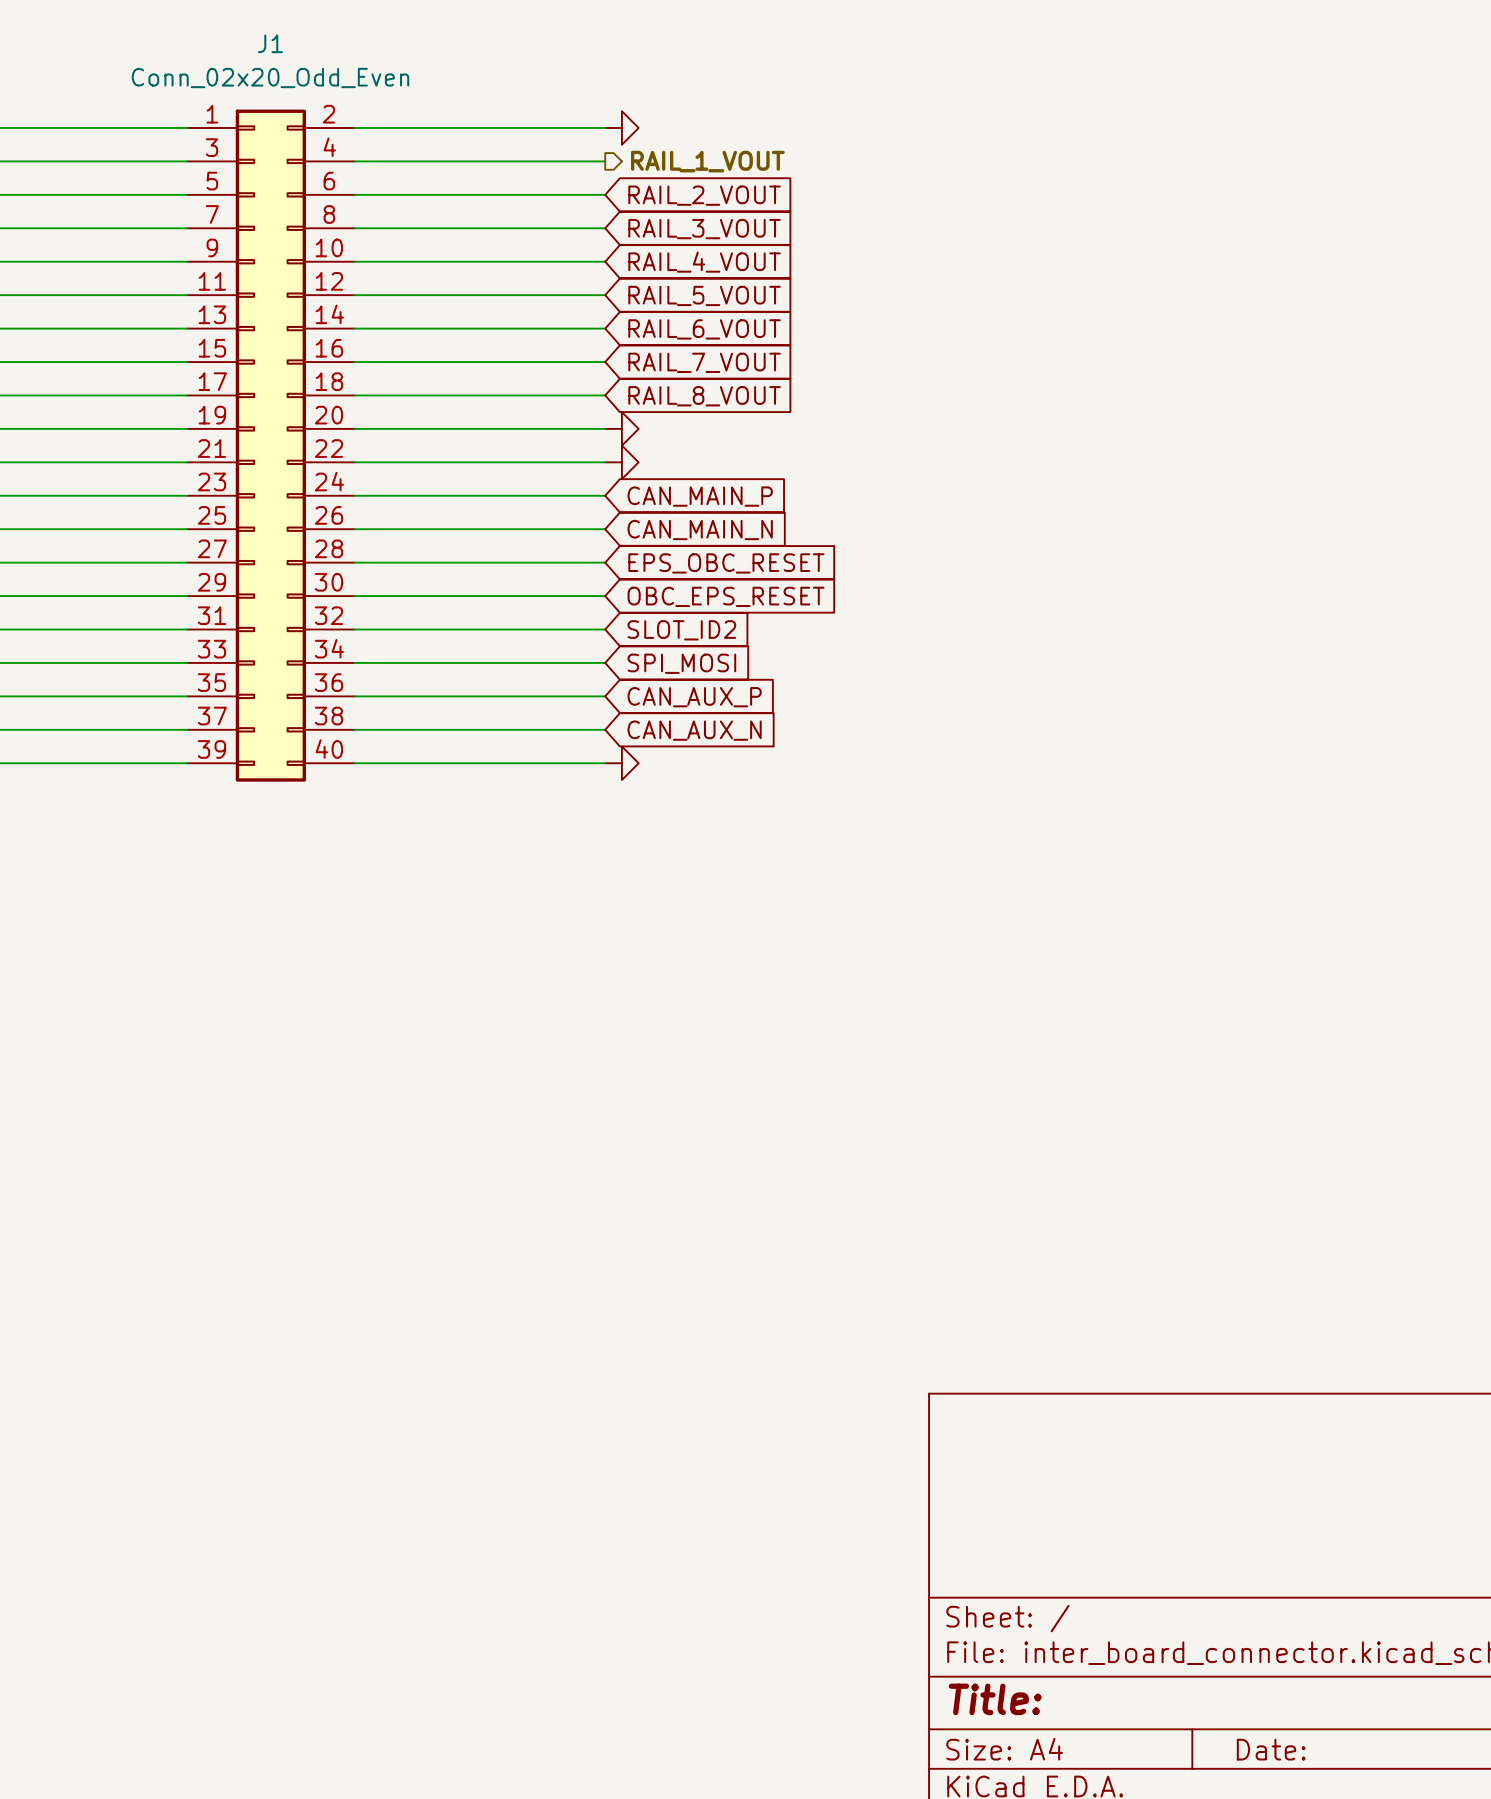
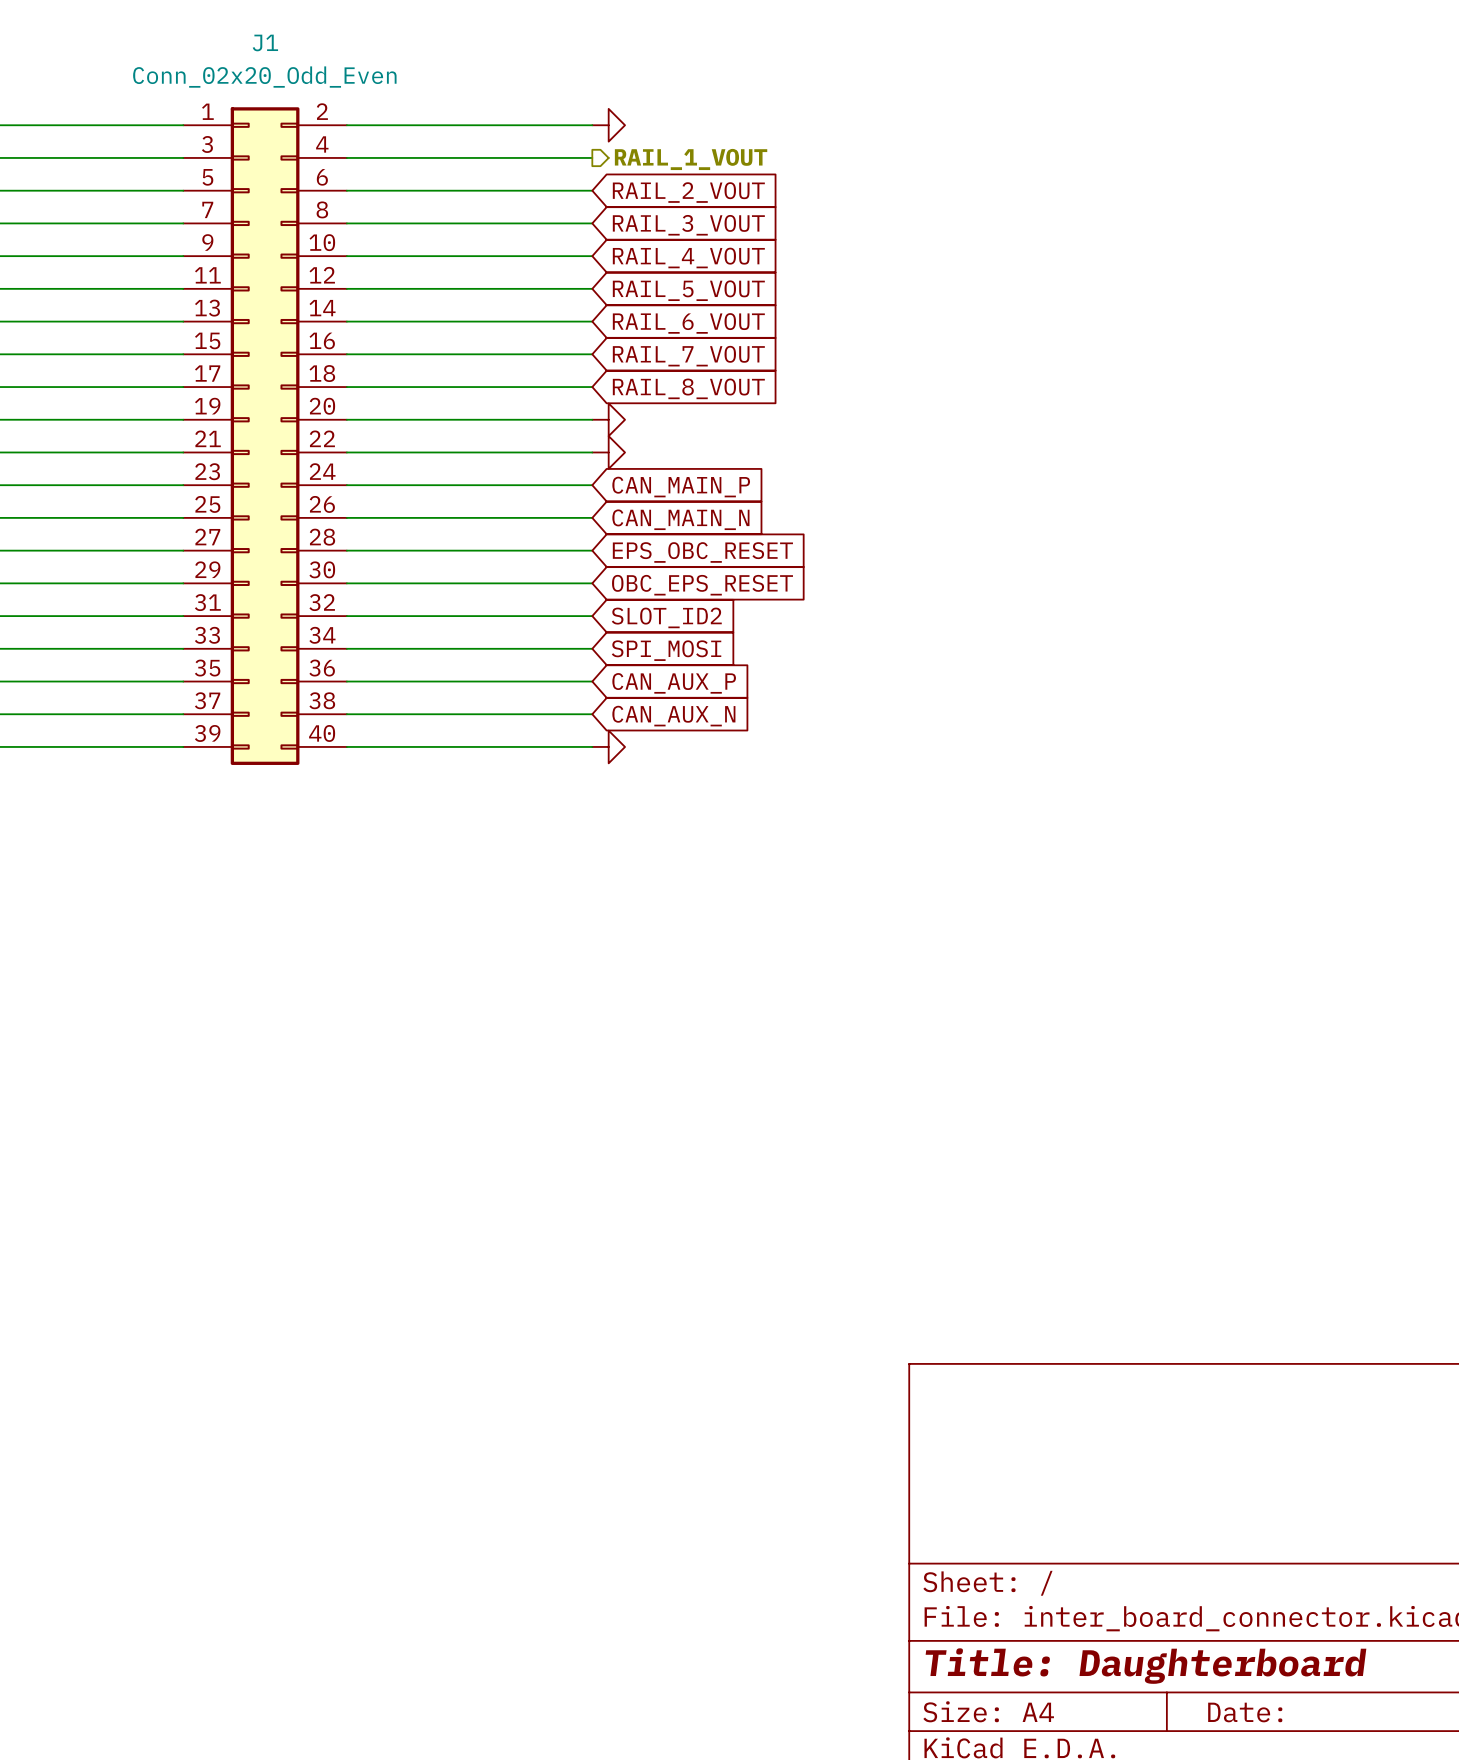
title block: Title: (995, 1699) -> Title: Daughterboard (1145, 1666)

